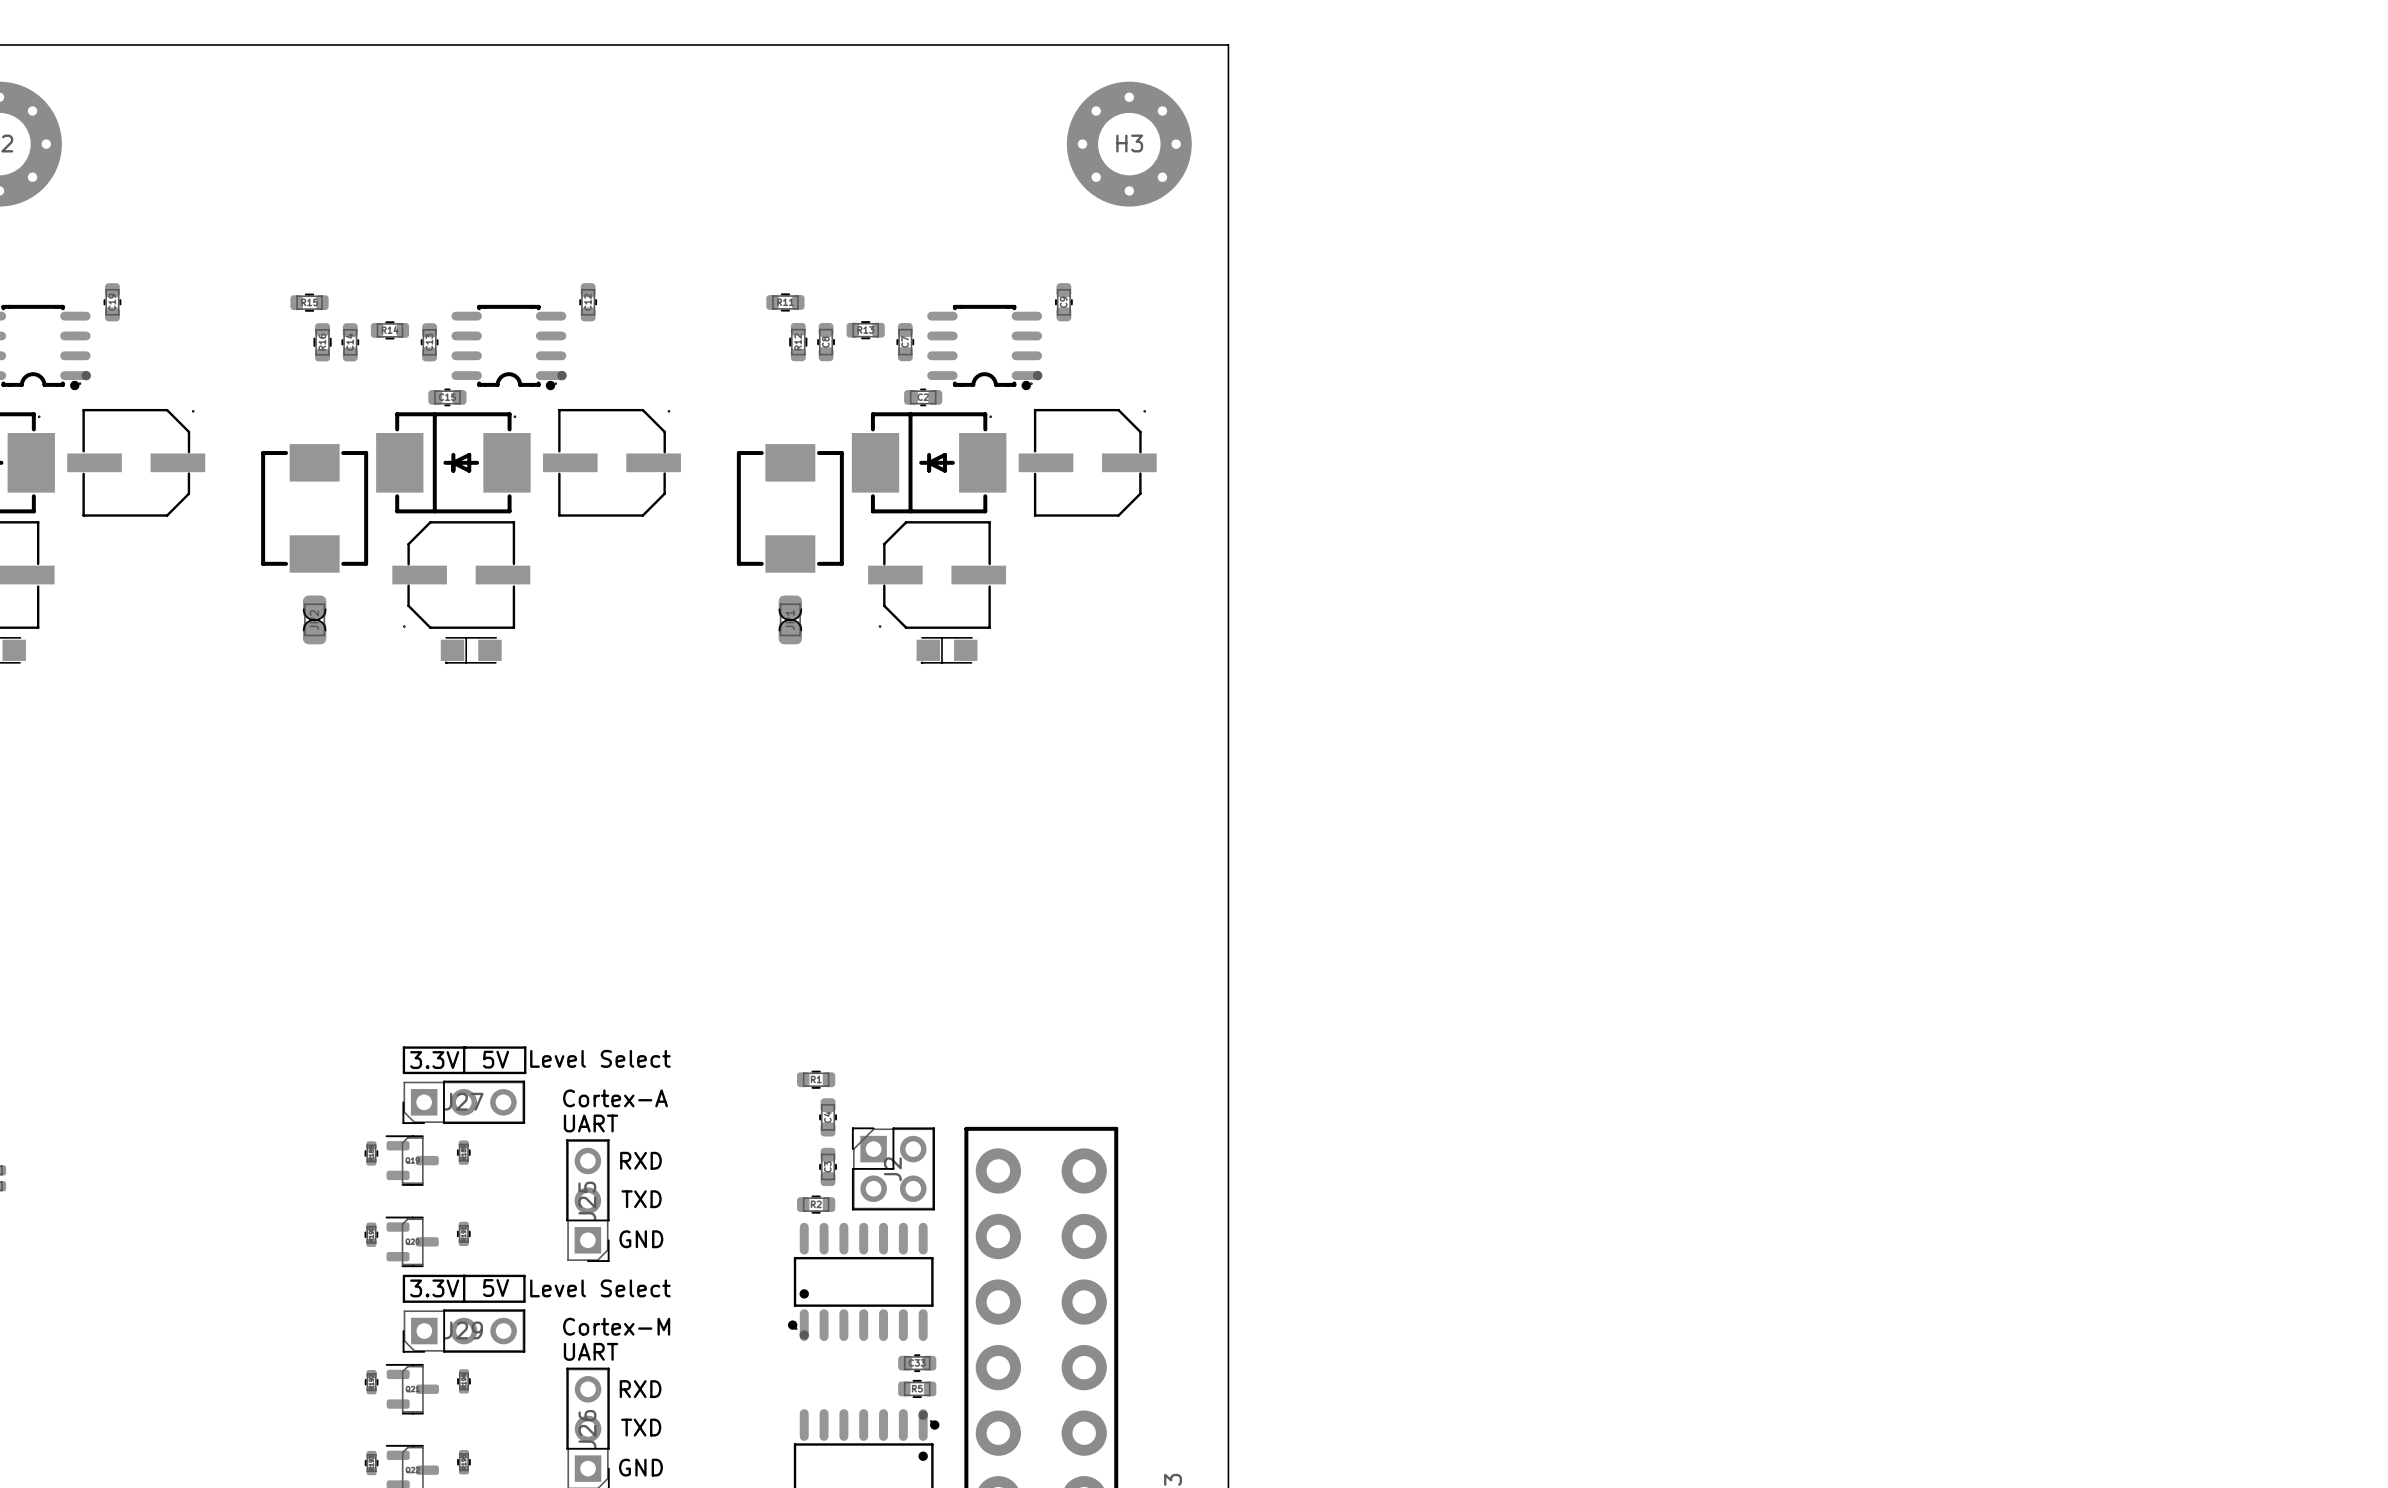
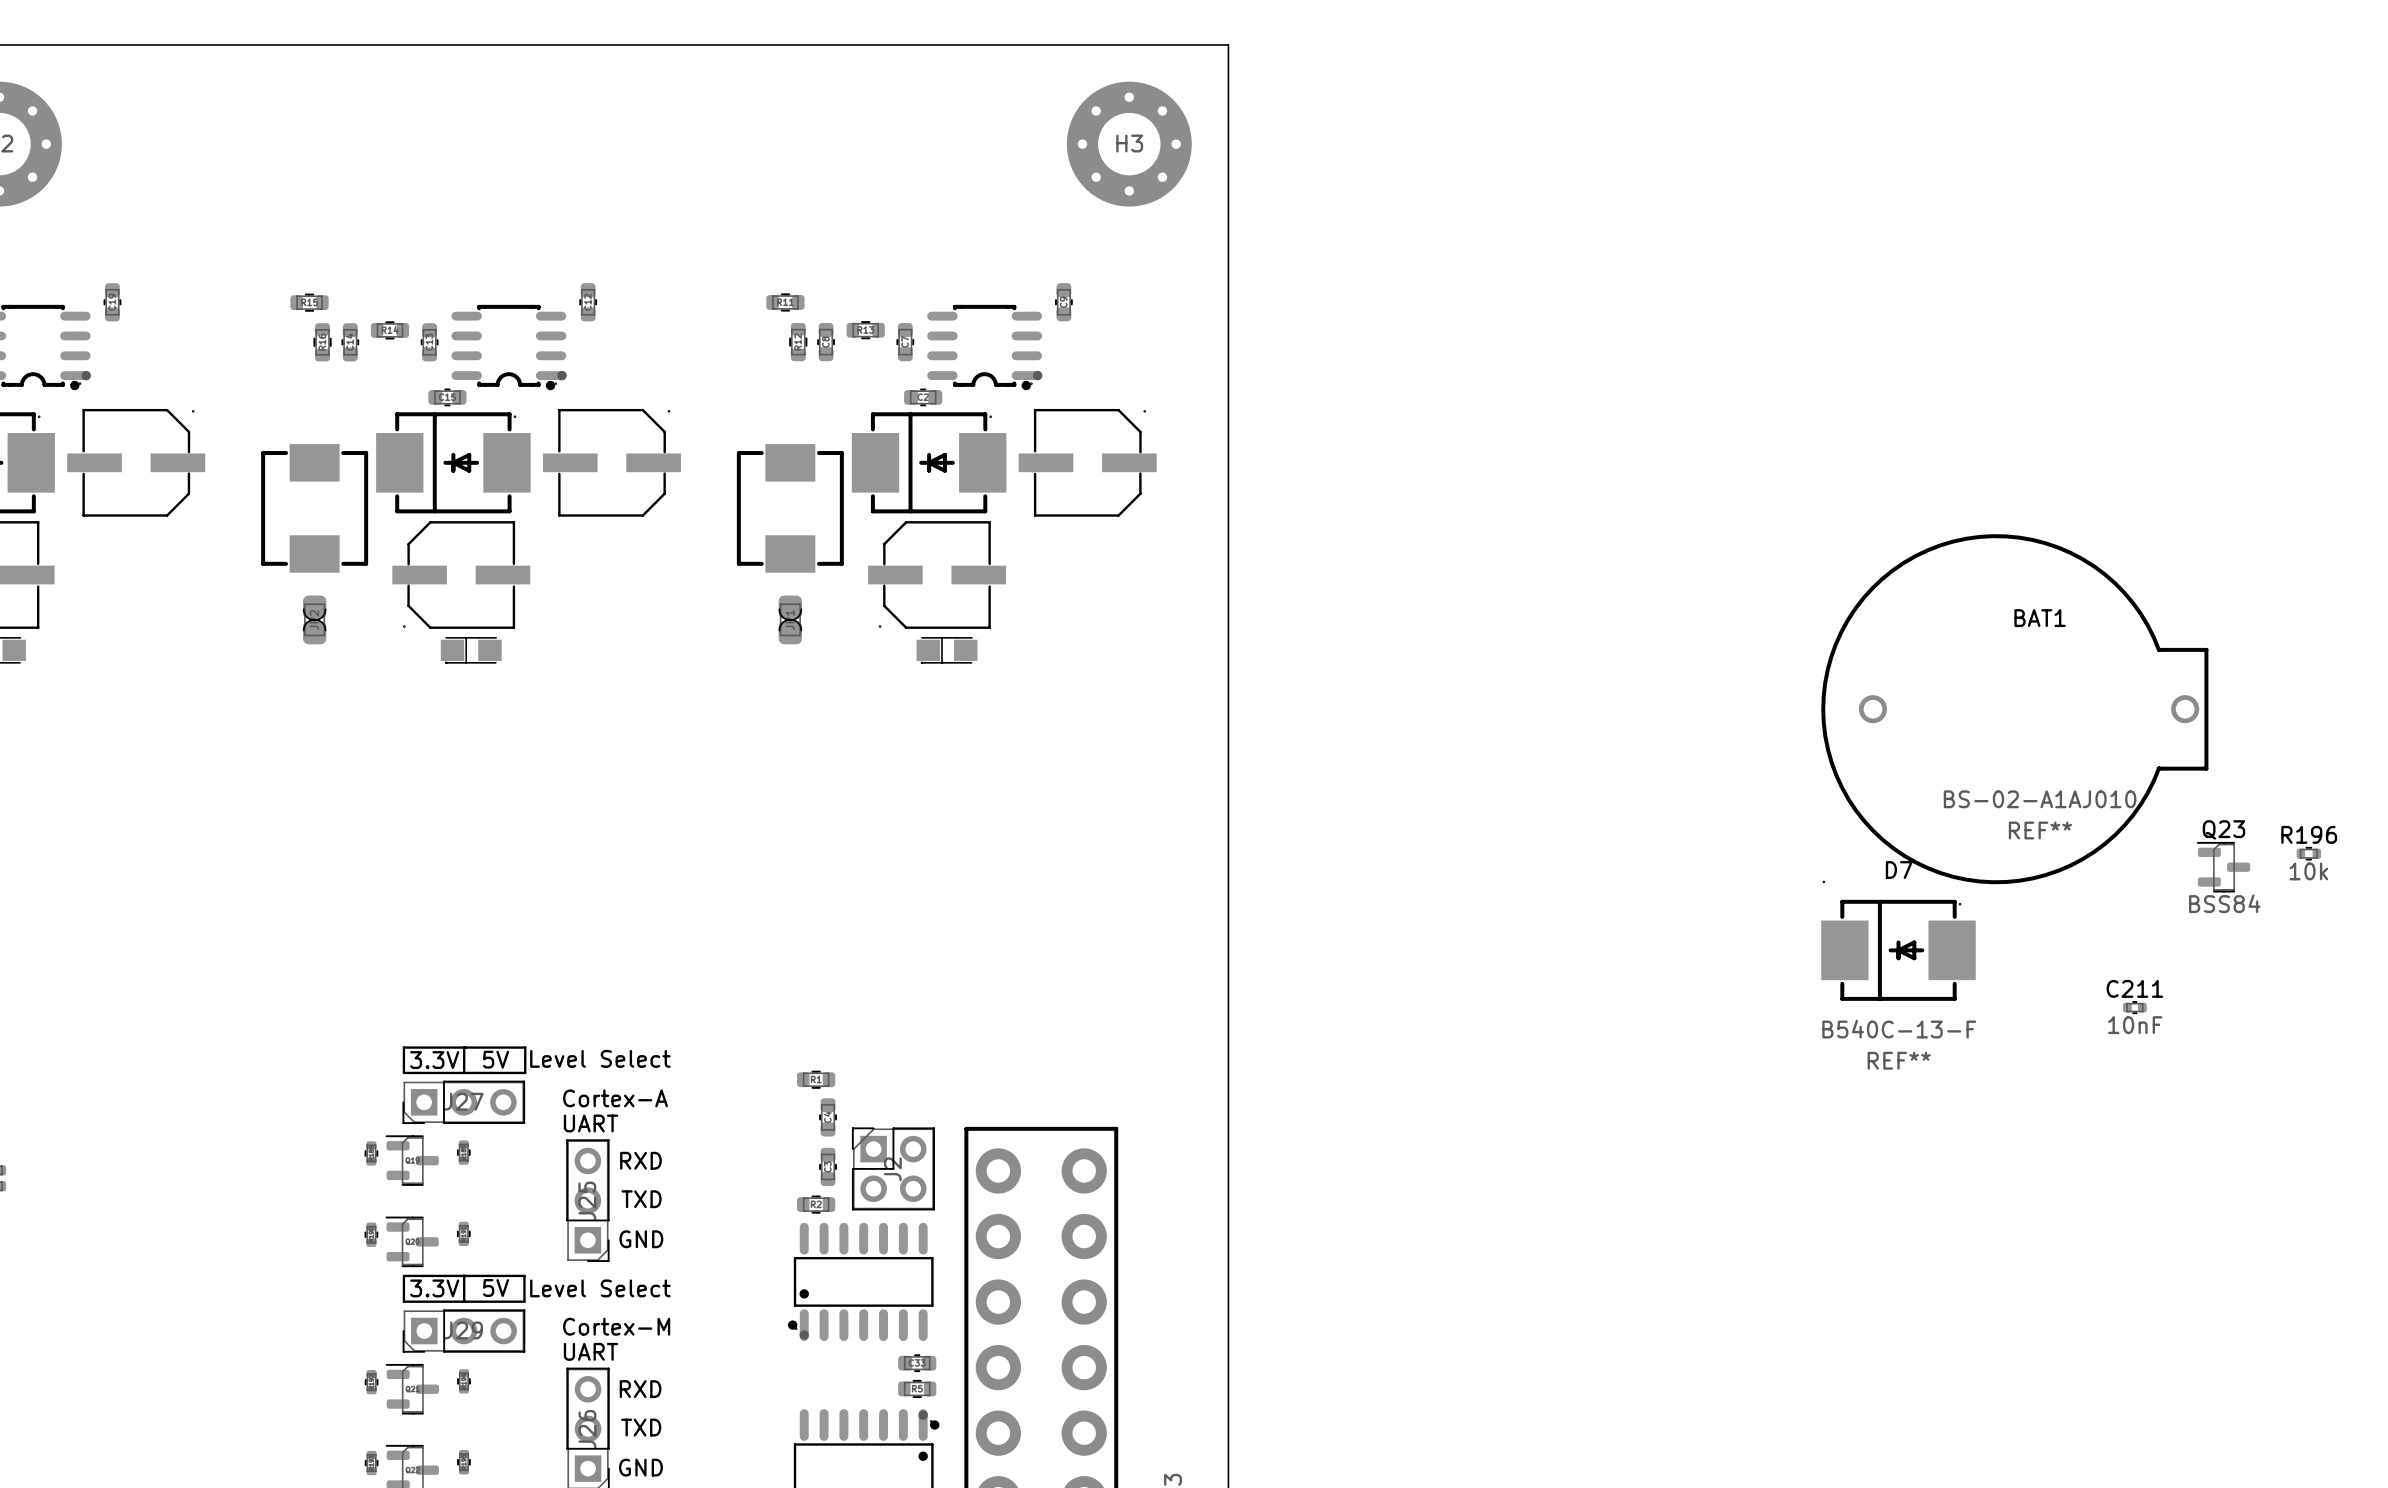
BAT1: none -> BS-02-A1AJ010 (2014, 709)
R196: none -> 10k (2308, 853)
Q23: none -> BSS84 (2223, 867)
D7: none -> B540C-13-F (1898, 950)
C211: none -> 10nF (2134, 1007)

